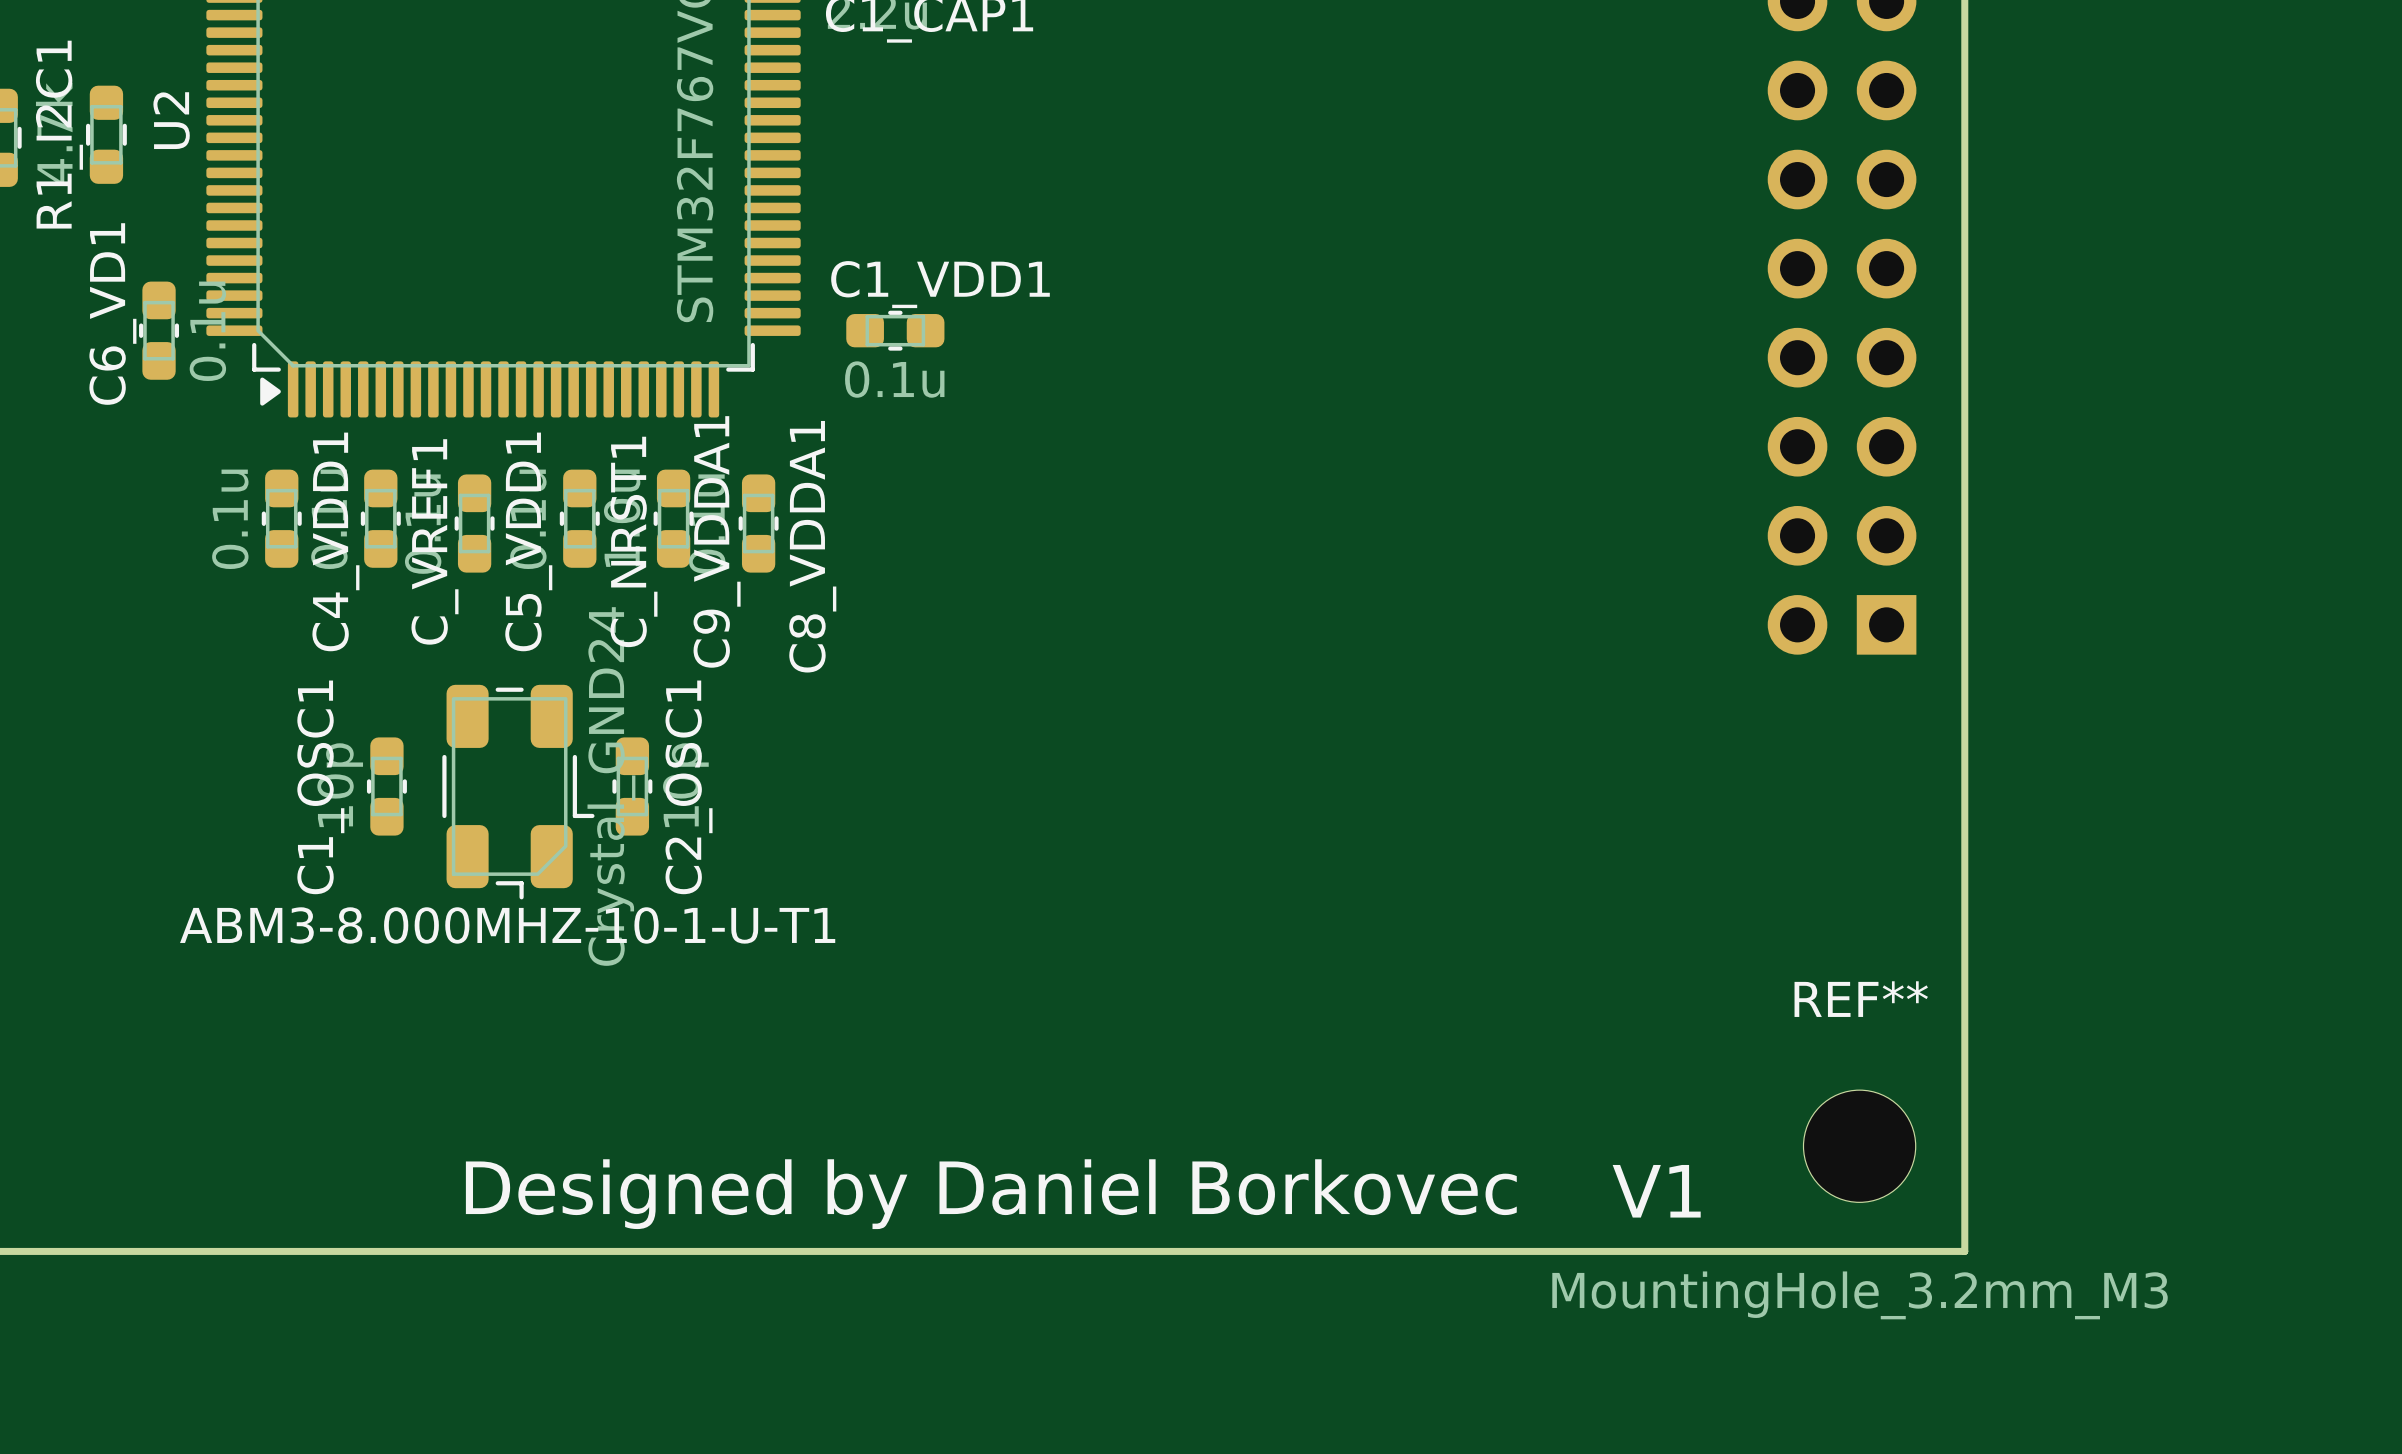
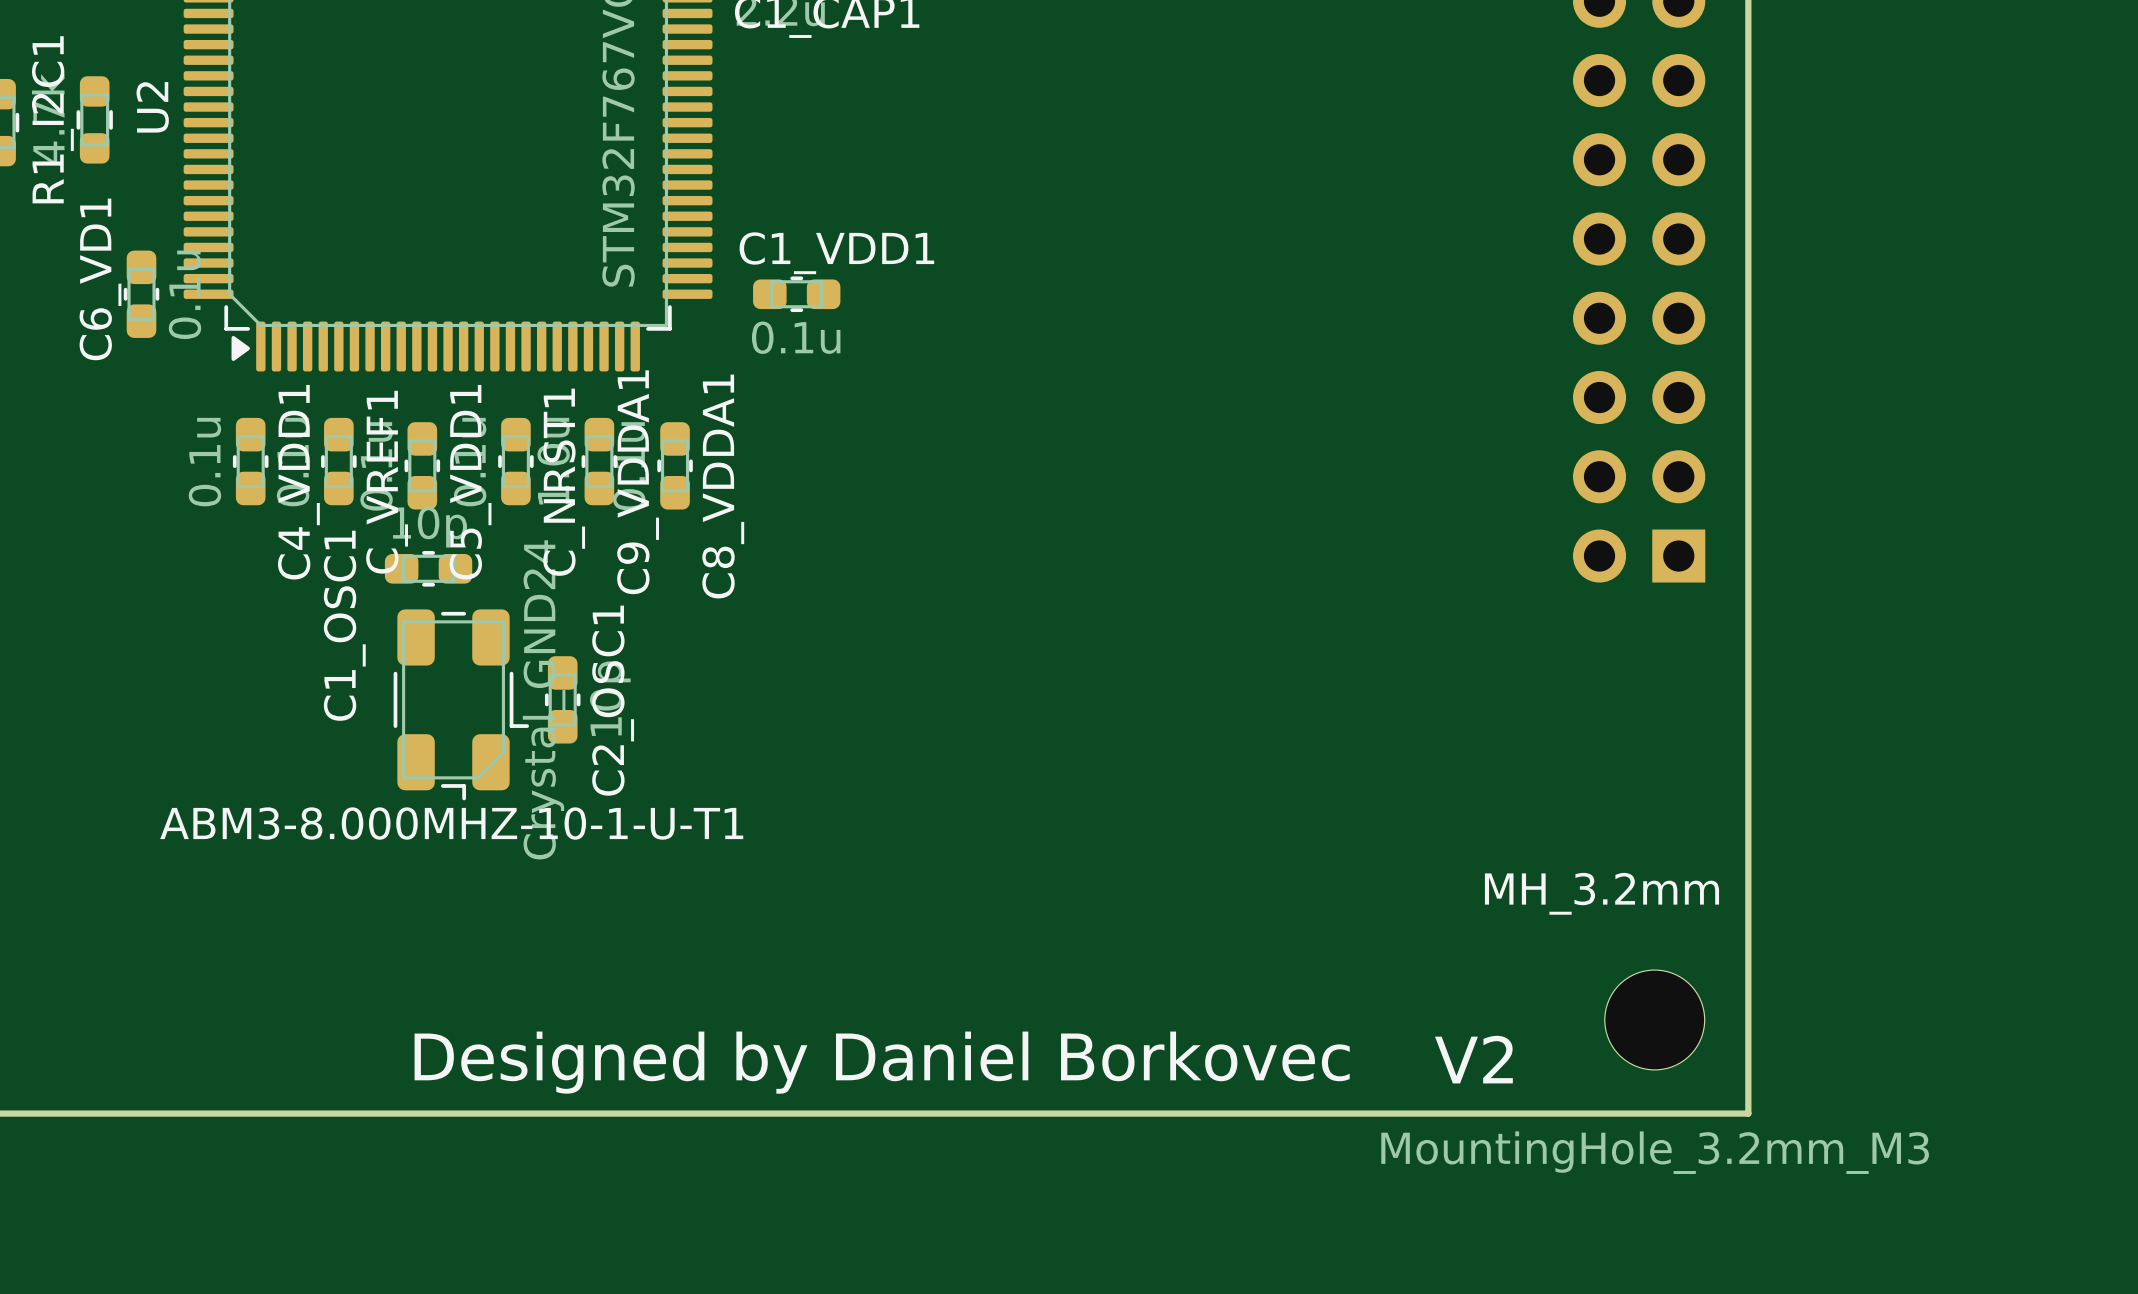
C1_OSC1 rotation: 0° (386, 786) -> 90° clockwise (428, 568)
C1_OSC1 position: (386, 786) -> (428, 568)
REF** name: REF** (1861, 999) -> MH_3.2mm (1601, 893)
text: V1 (1656, 1191) -> V2 (1473, 1059)

